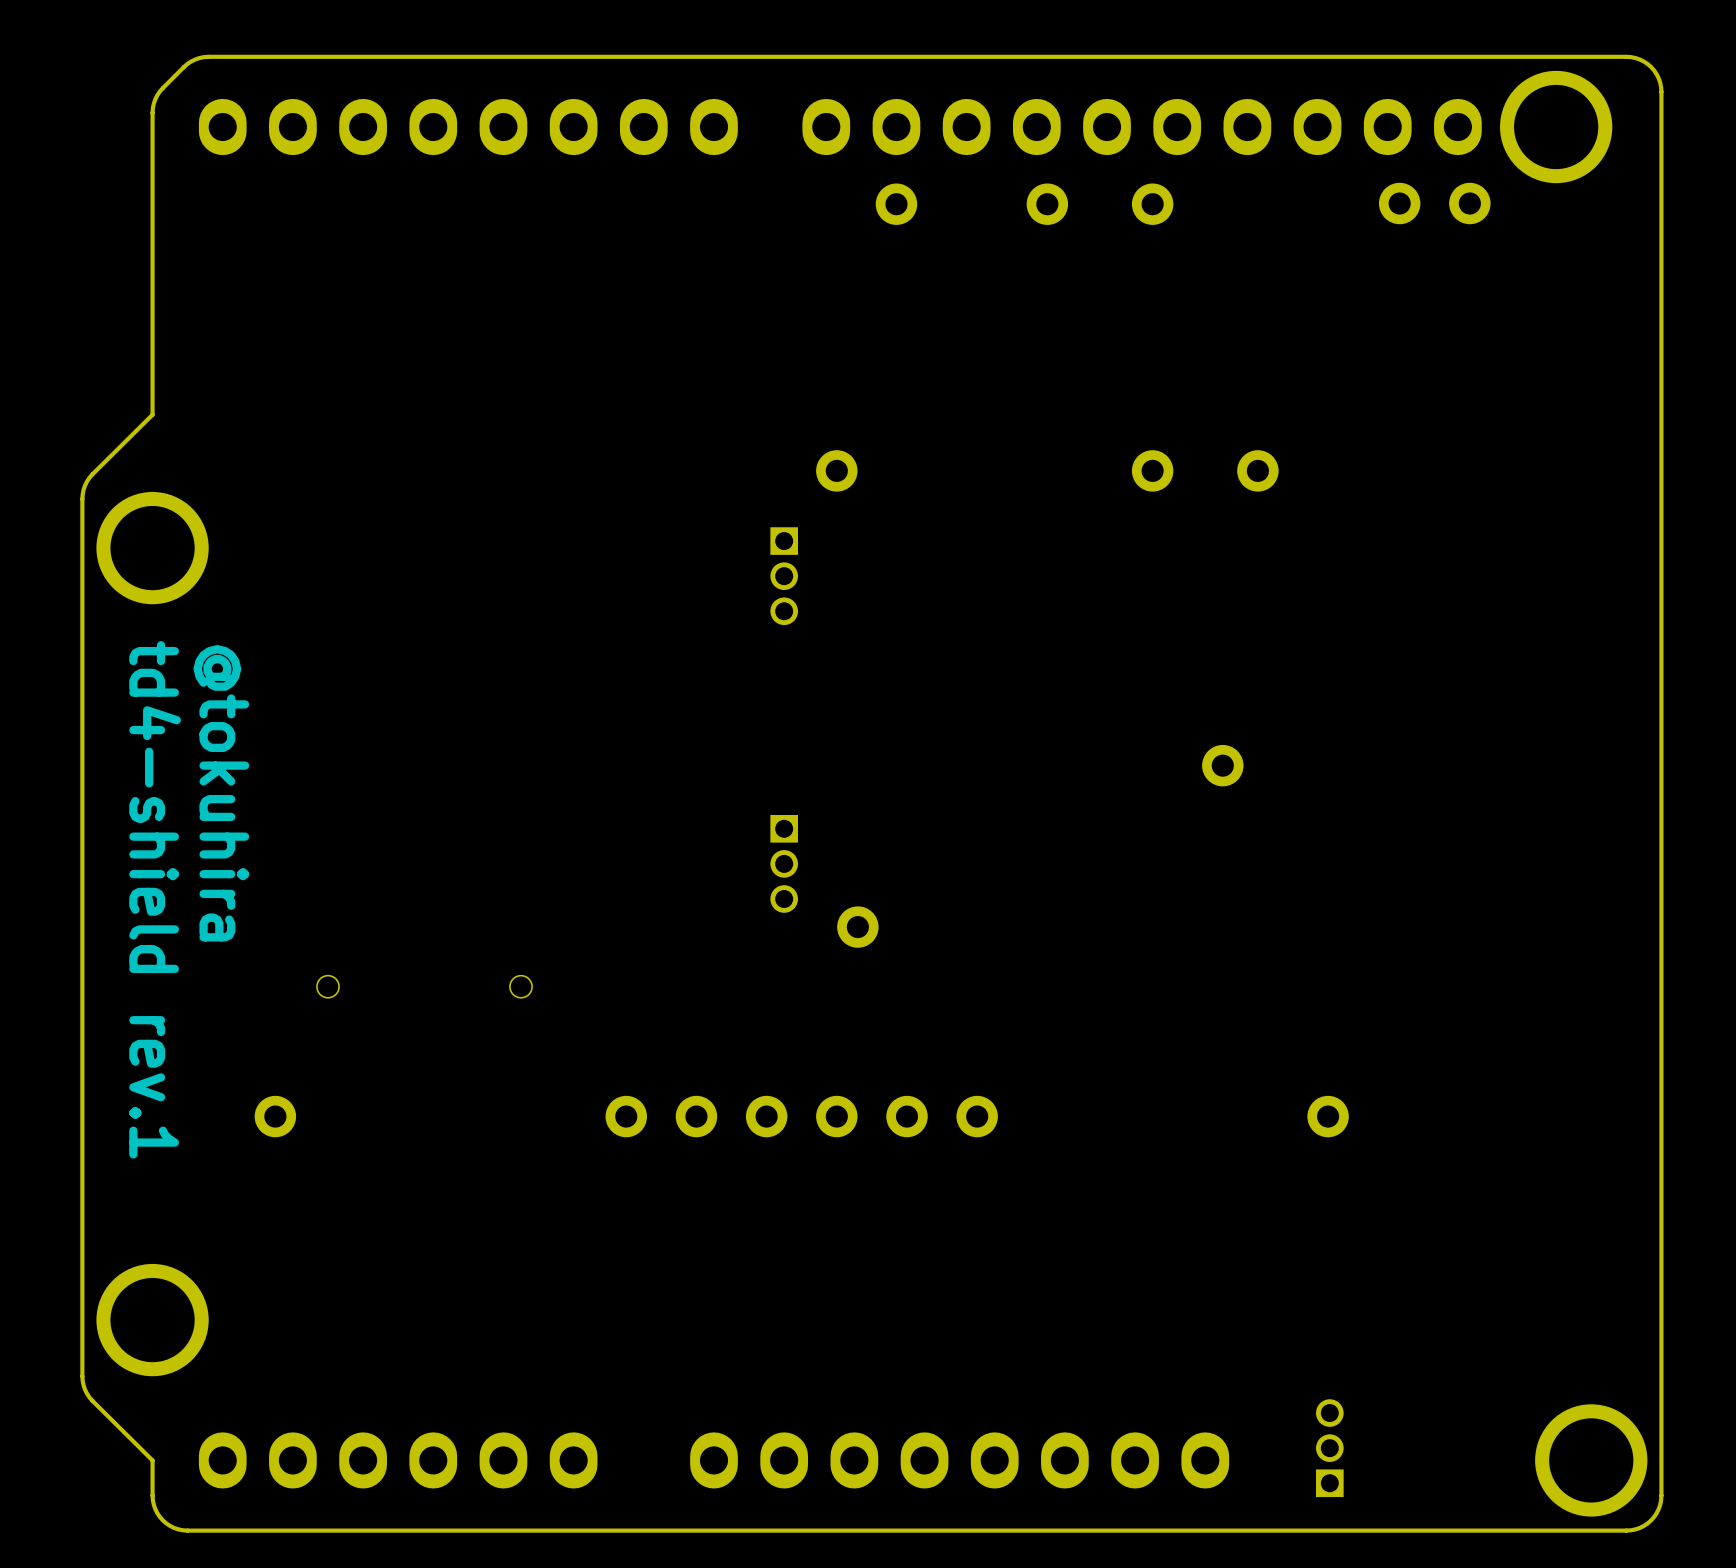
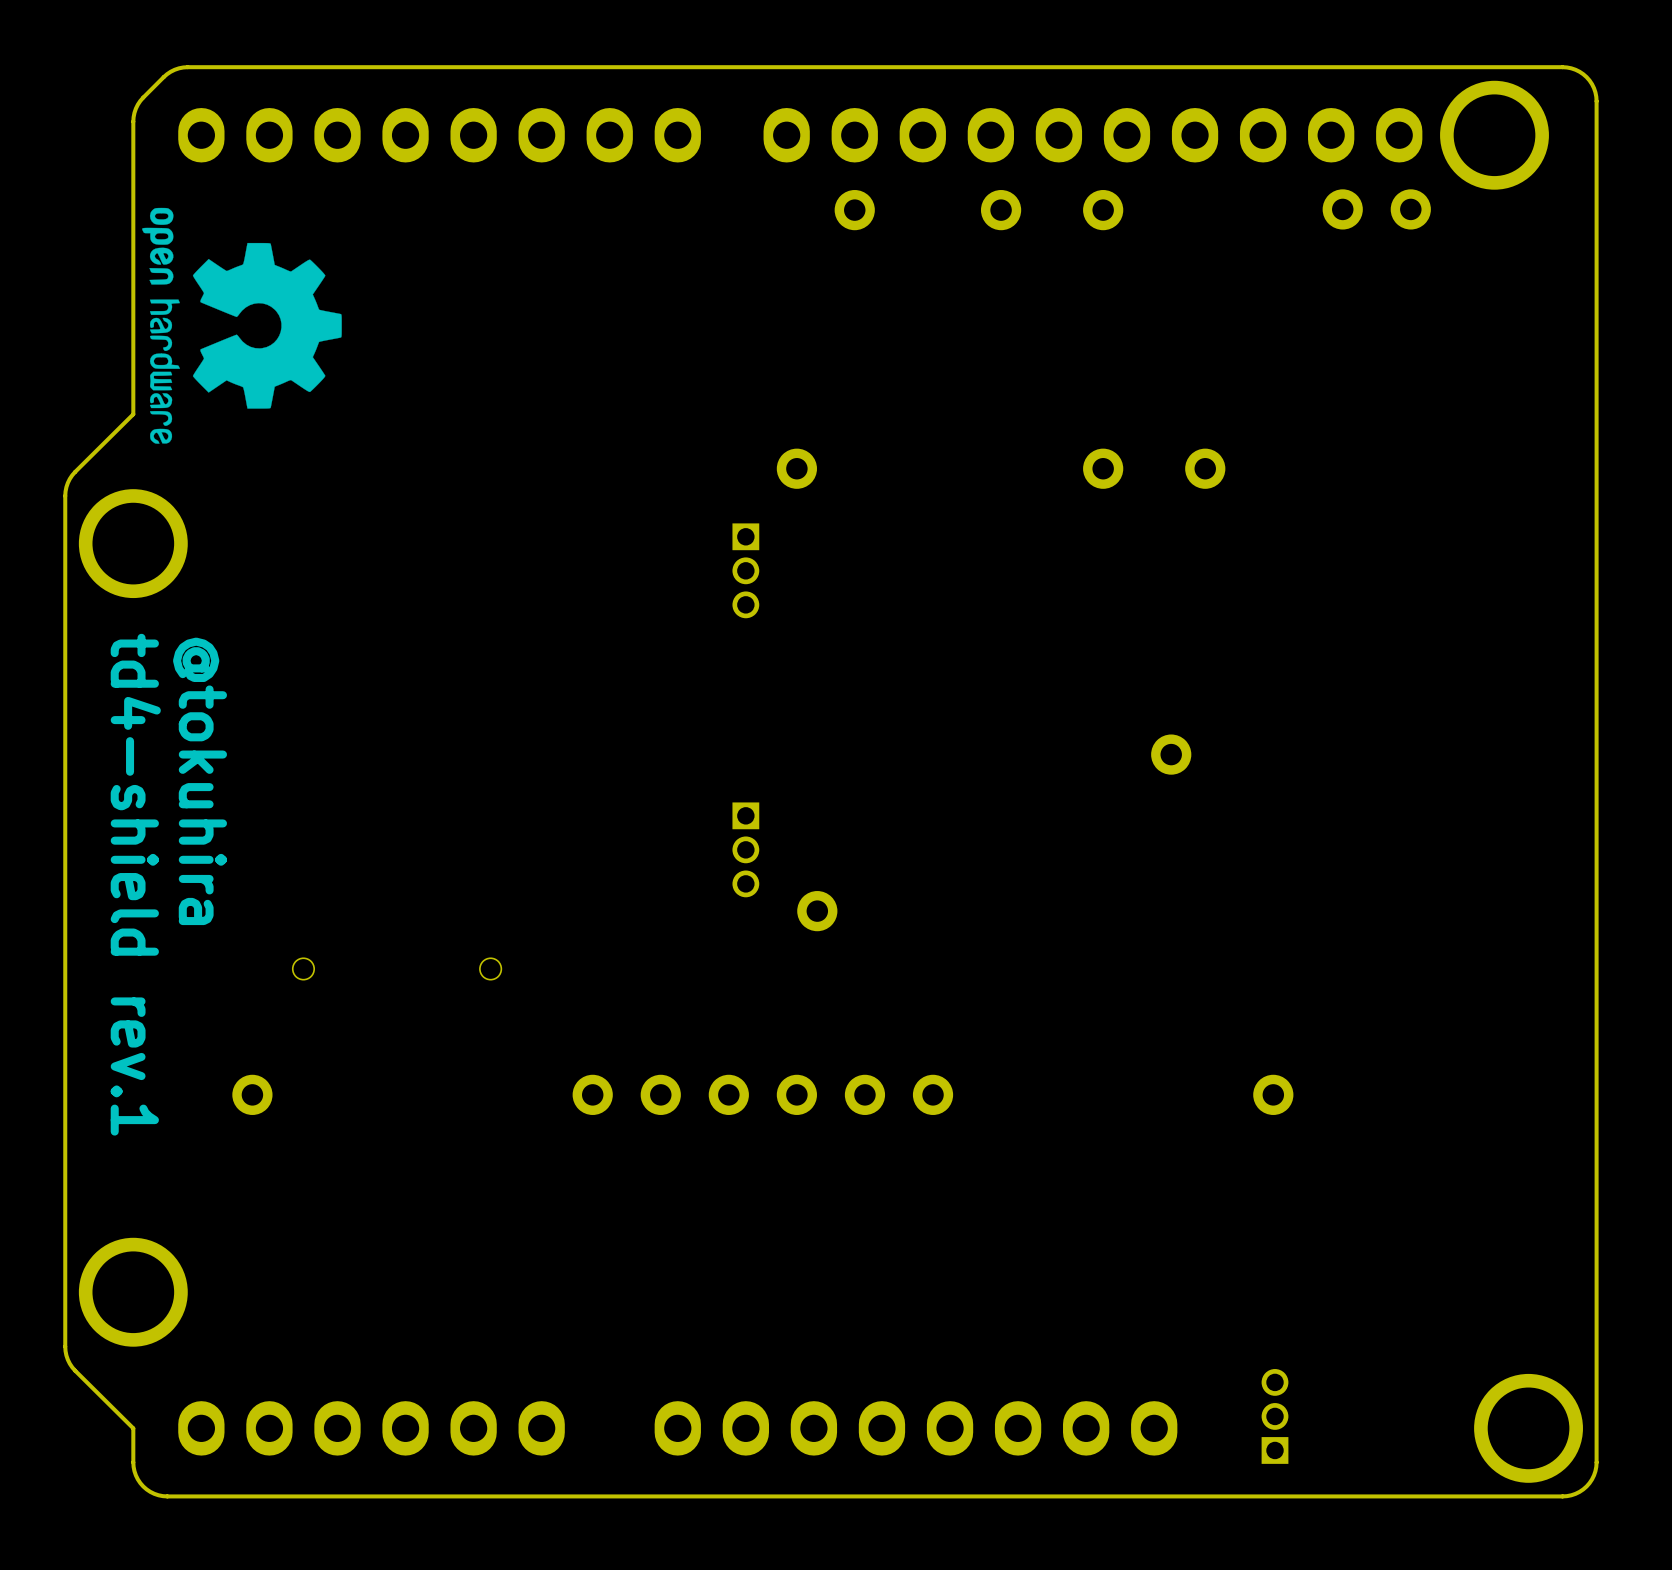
drawing: none -> [142, 207, 342, 444]

